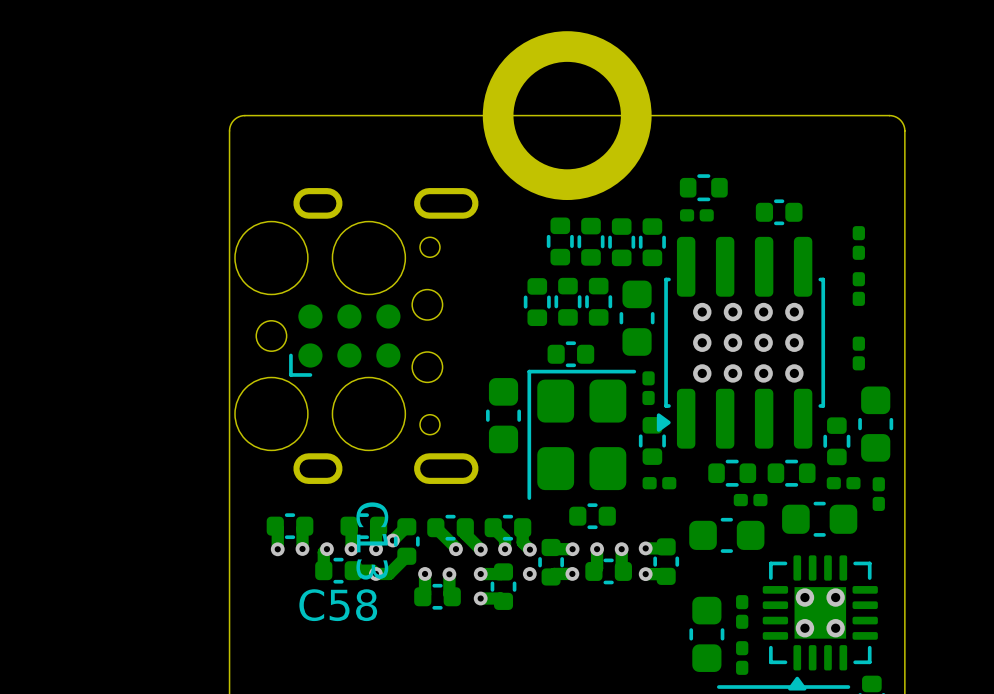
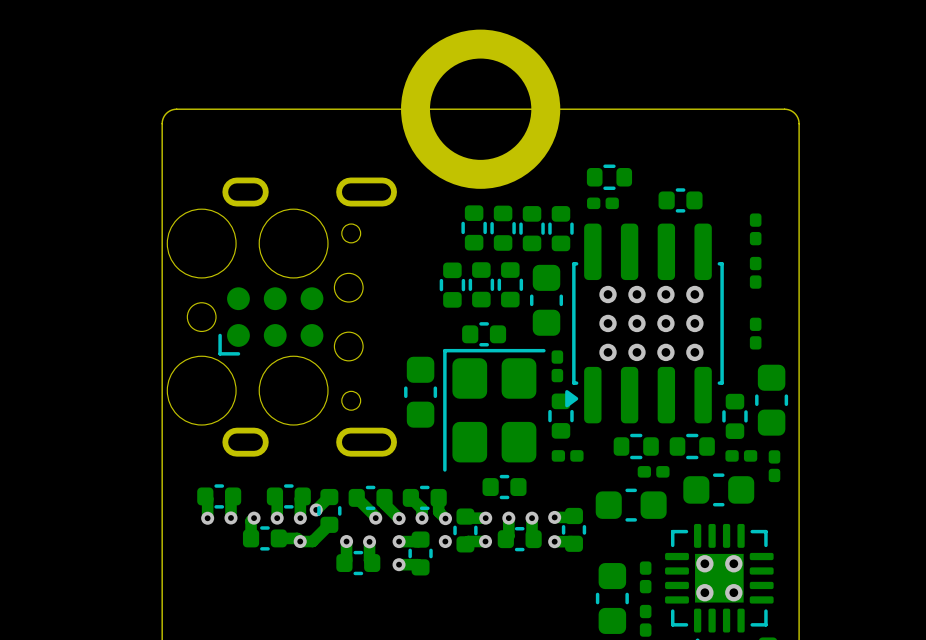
C13 name: C13 (372, 541) -> none
C58 name: C58 (338, 605) -> none

